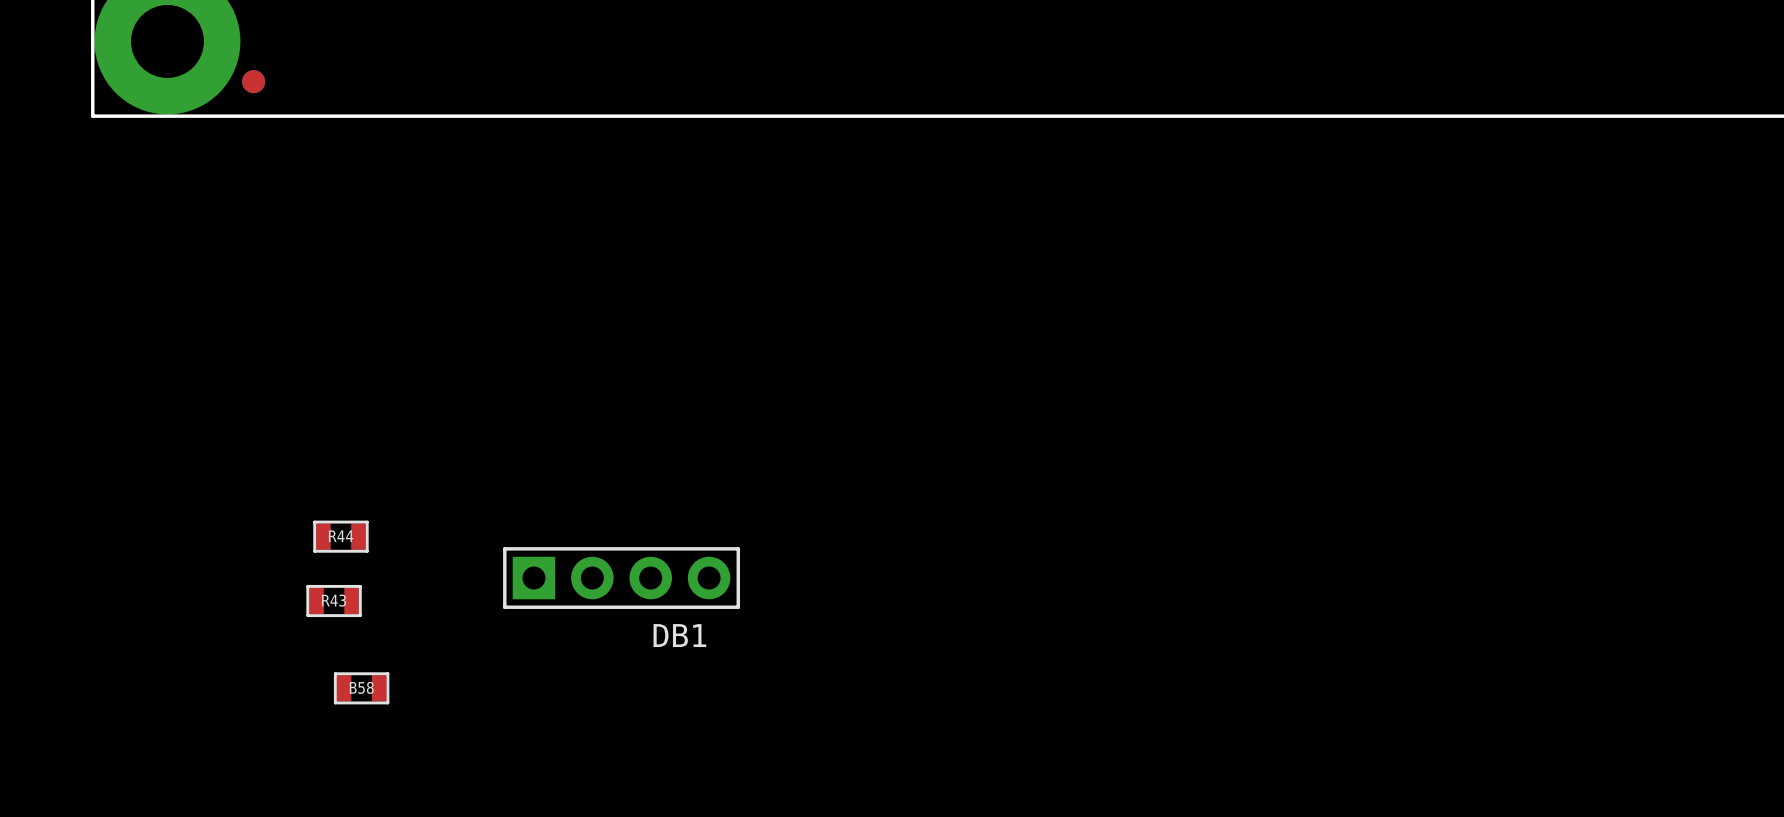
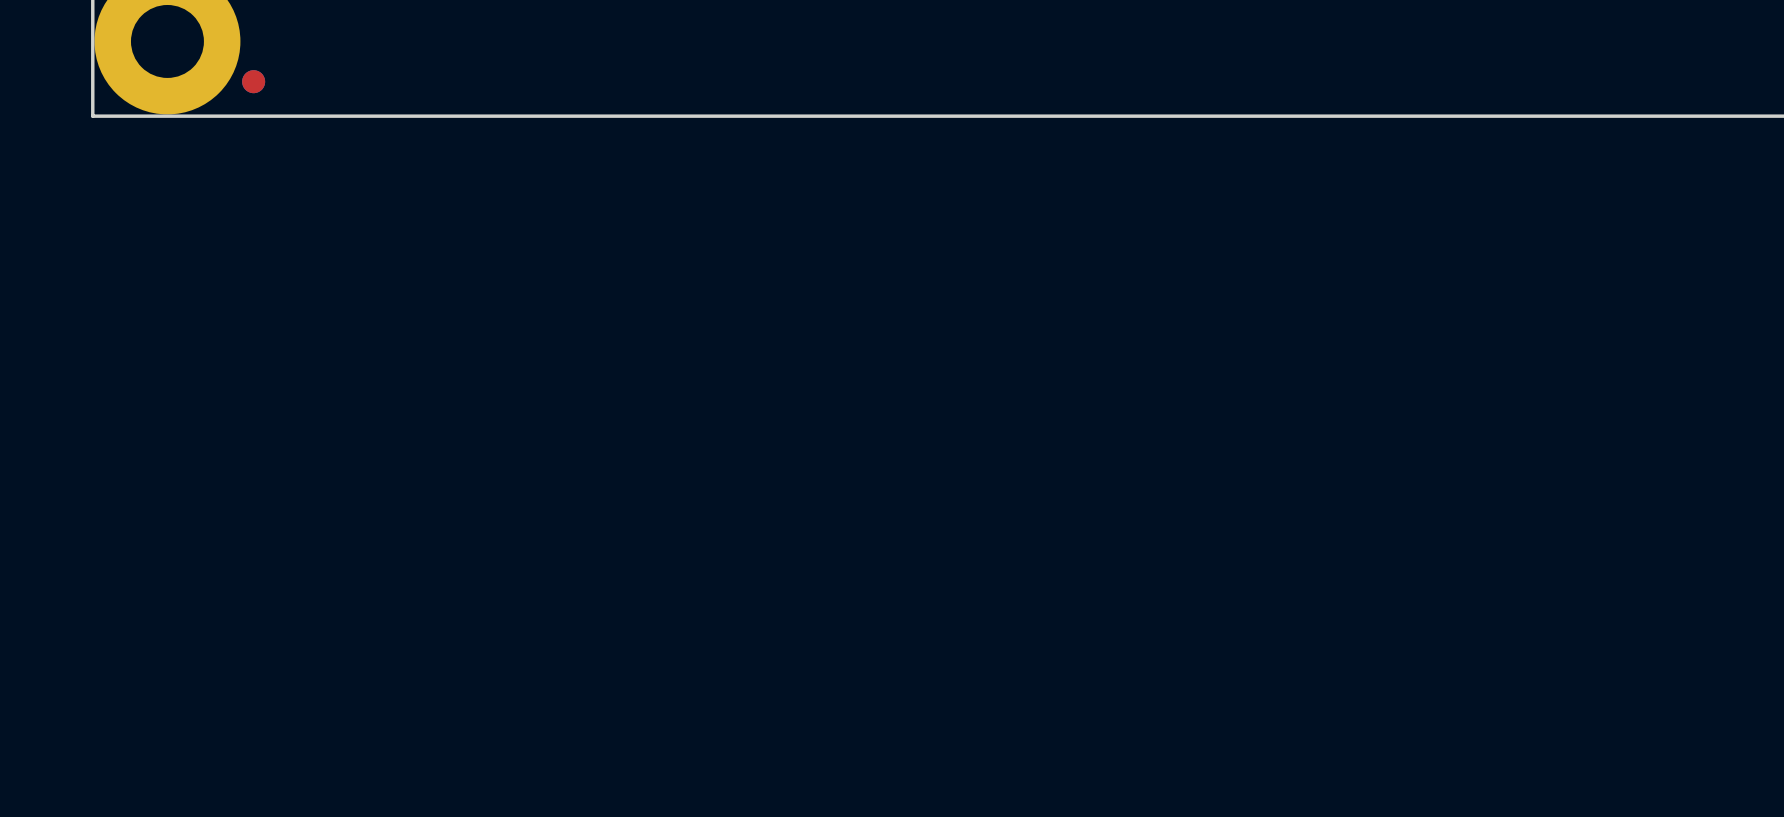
R44: (340, 536) -> none
DB1: (621, 578) -> none
R43: (334, 601) -> none
B58: (361, 688) -> none

